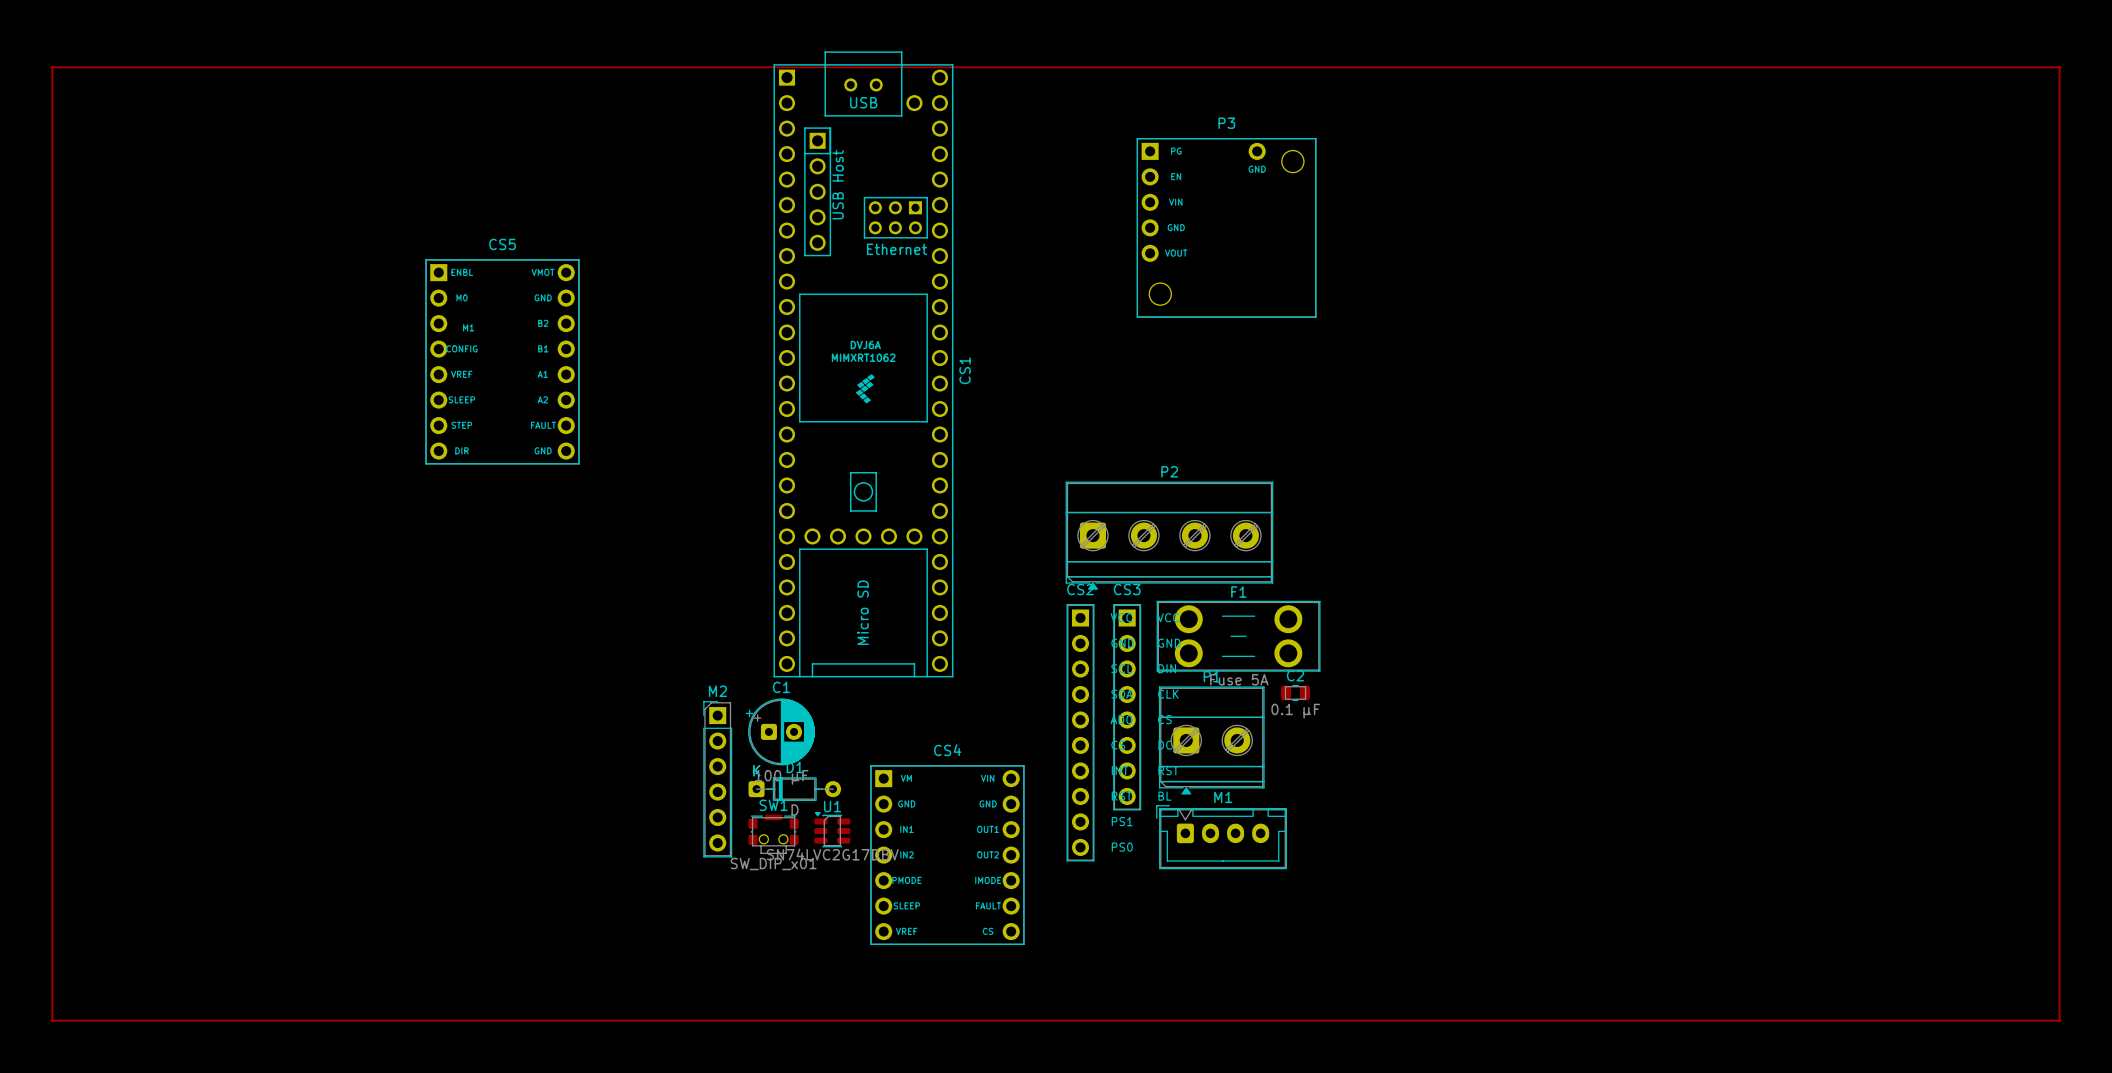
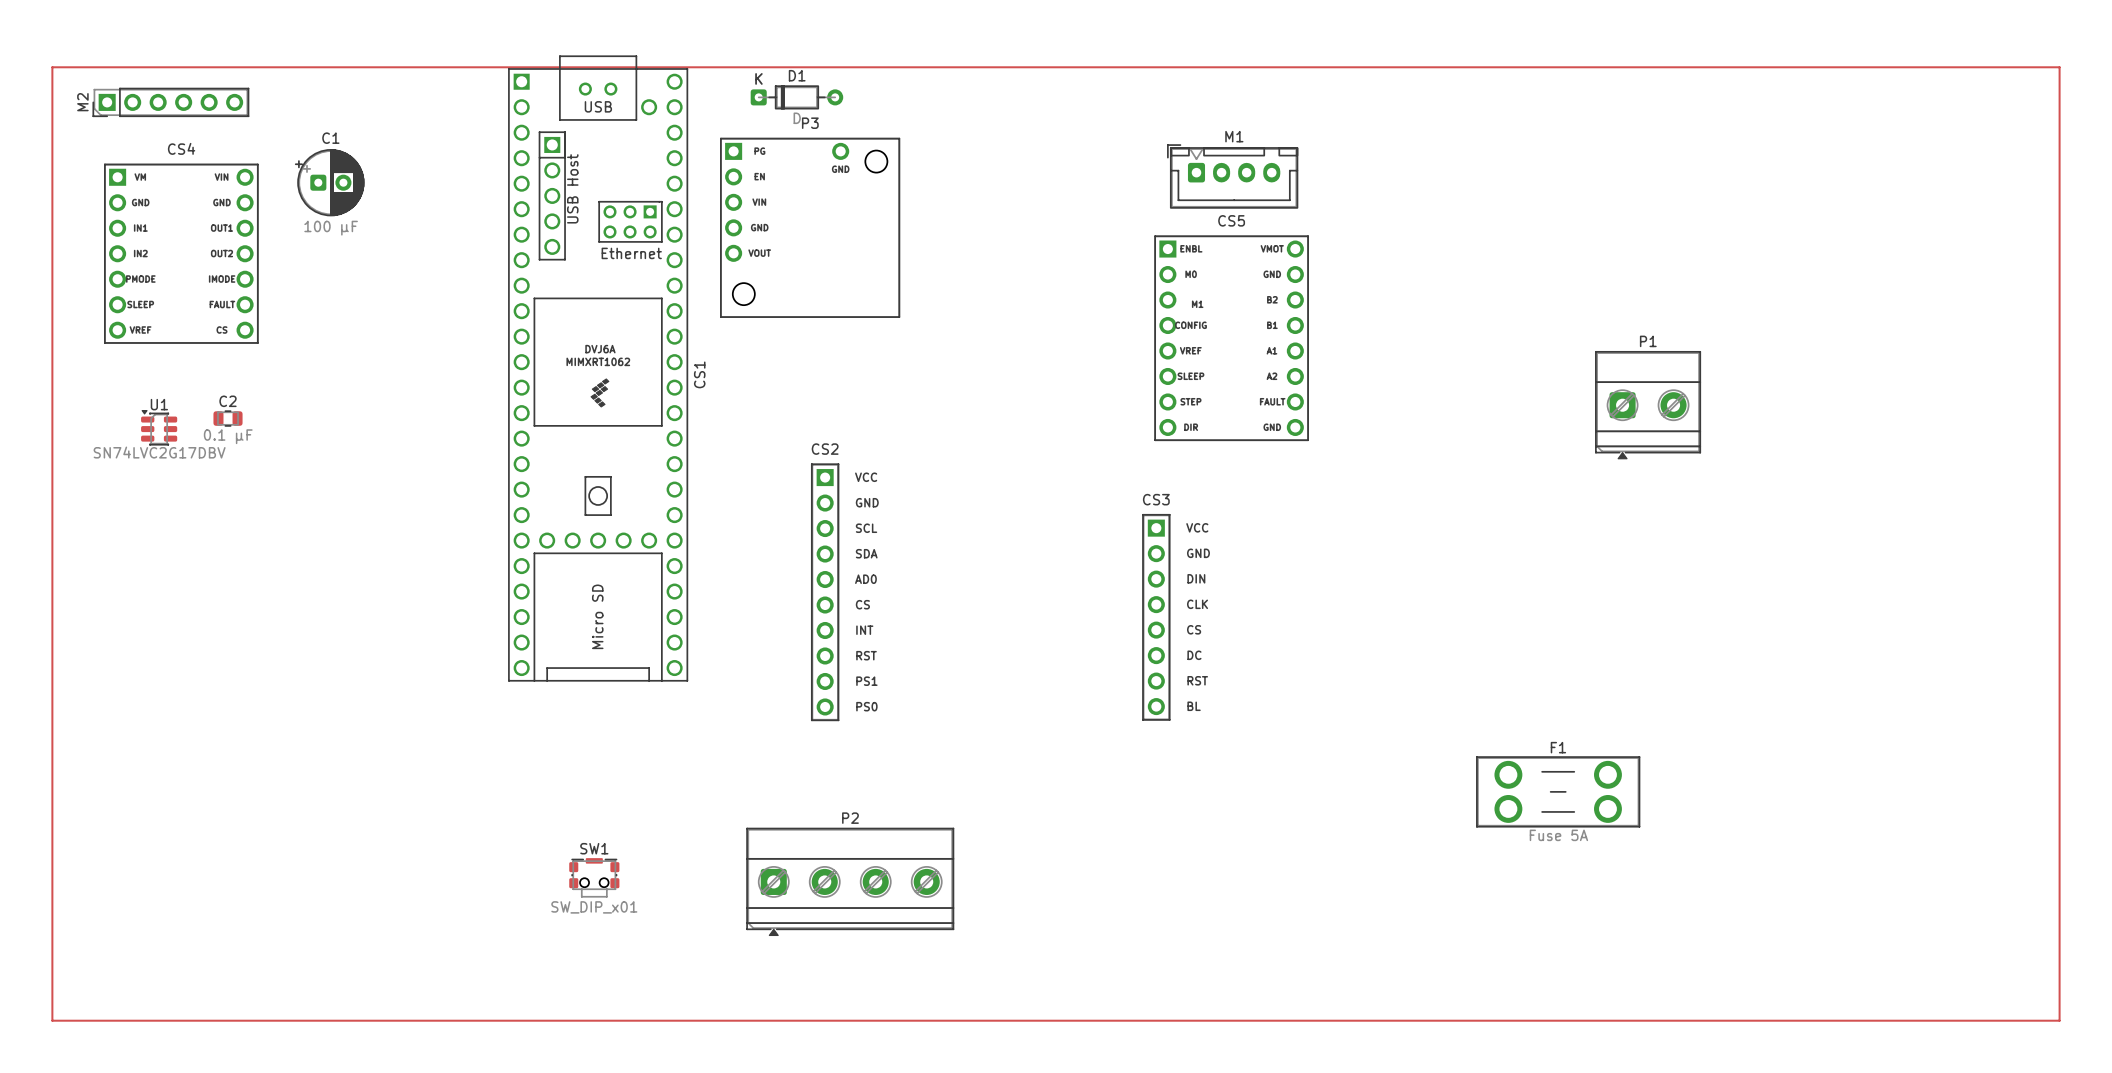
P3 position: (1226, 227) -> (810, 227)
CS5 position: (502, 361) -> (1231, 338)
CS1 position: (863, 364) -> (598, 368)
P2 position: (1169, 535) -> (850, 881)
F1 position: (1238, 636) -> (1558, 791)
C2 position: (1295, 692) -> (228, 418)
CS3 position: (1127, 707) -> (1156, 617)
C1 position: (780, 731) -> (329, 182)
CS2 position: (1080, 732) -> (825, 592)
P1 position: (1211, 740) -> (1648, 405)
M2 rotation: 0° (717, 779) -> 90° counterclockwise (170, 102)
M2 position: (717, 779) -> (170, 102)
D1 position: (794, 789) -> (796, 97)
U1 position: (832, 829) -> (159, 427)
SW1 position: (773, 834) -> (594, 877)
M1 position: (1221, 837) -> (1232, 176)
CS4 position: (947, 855) -> (181, 253)

